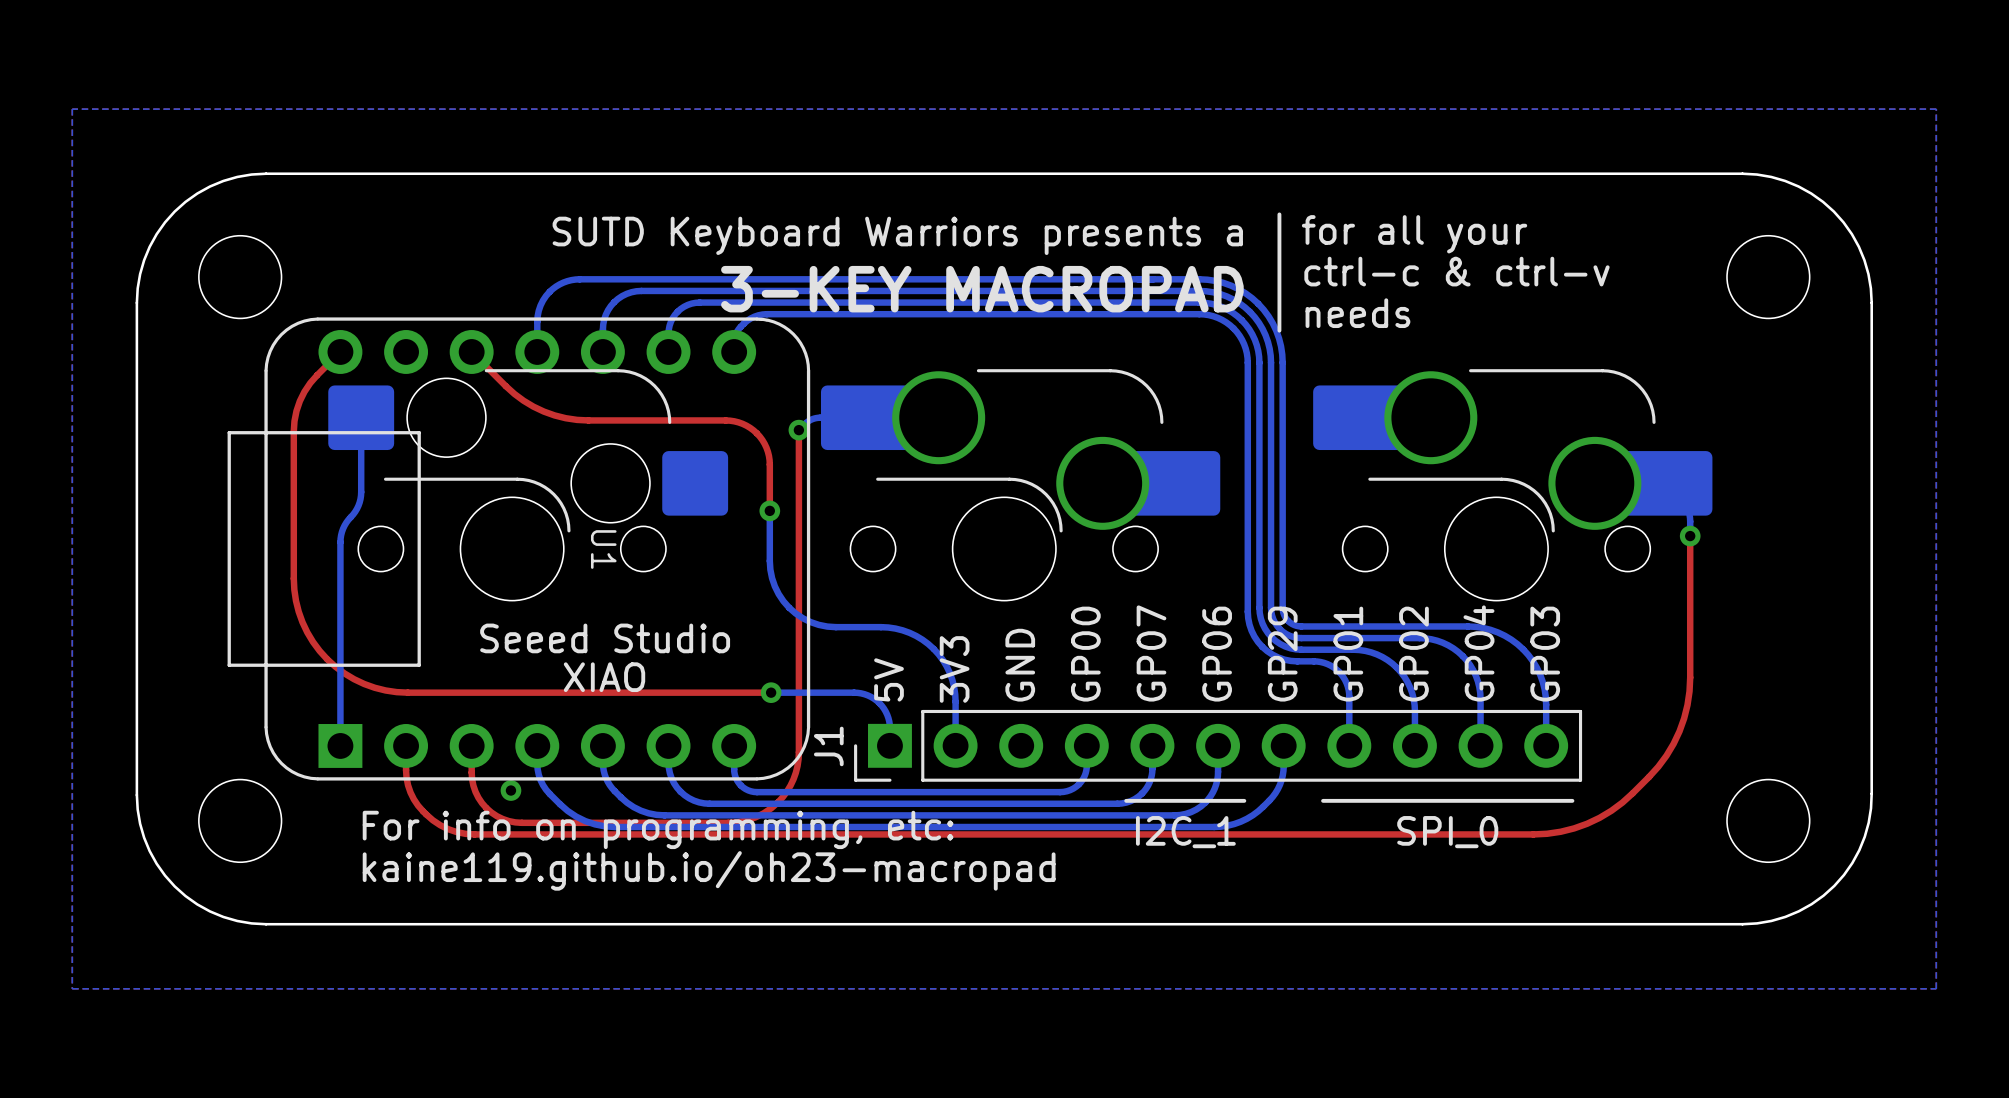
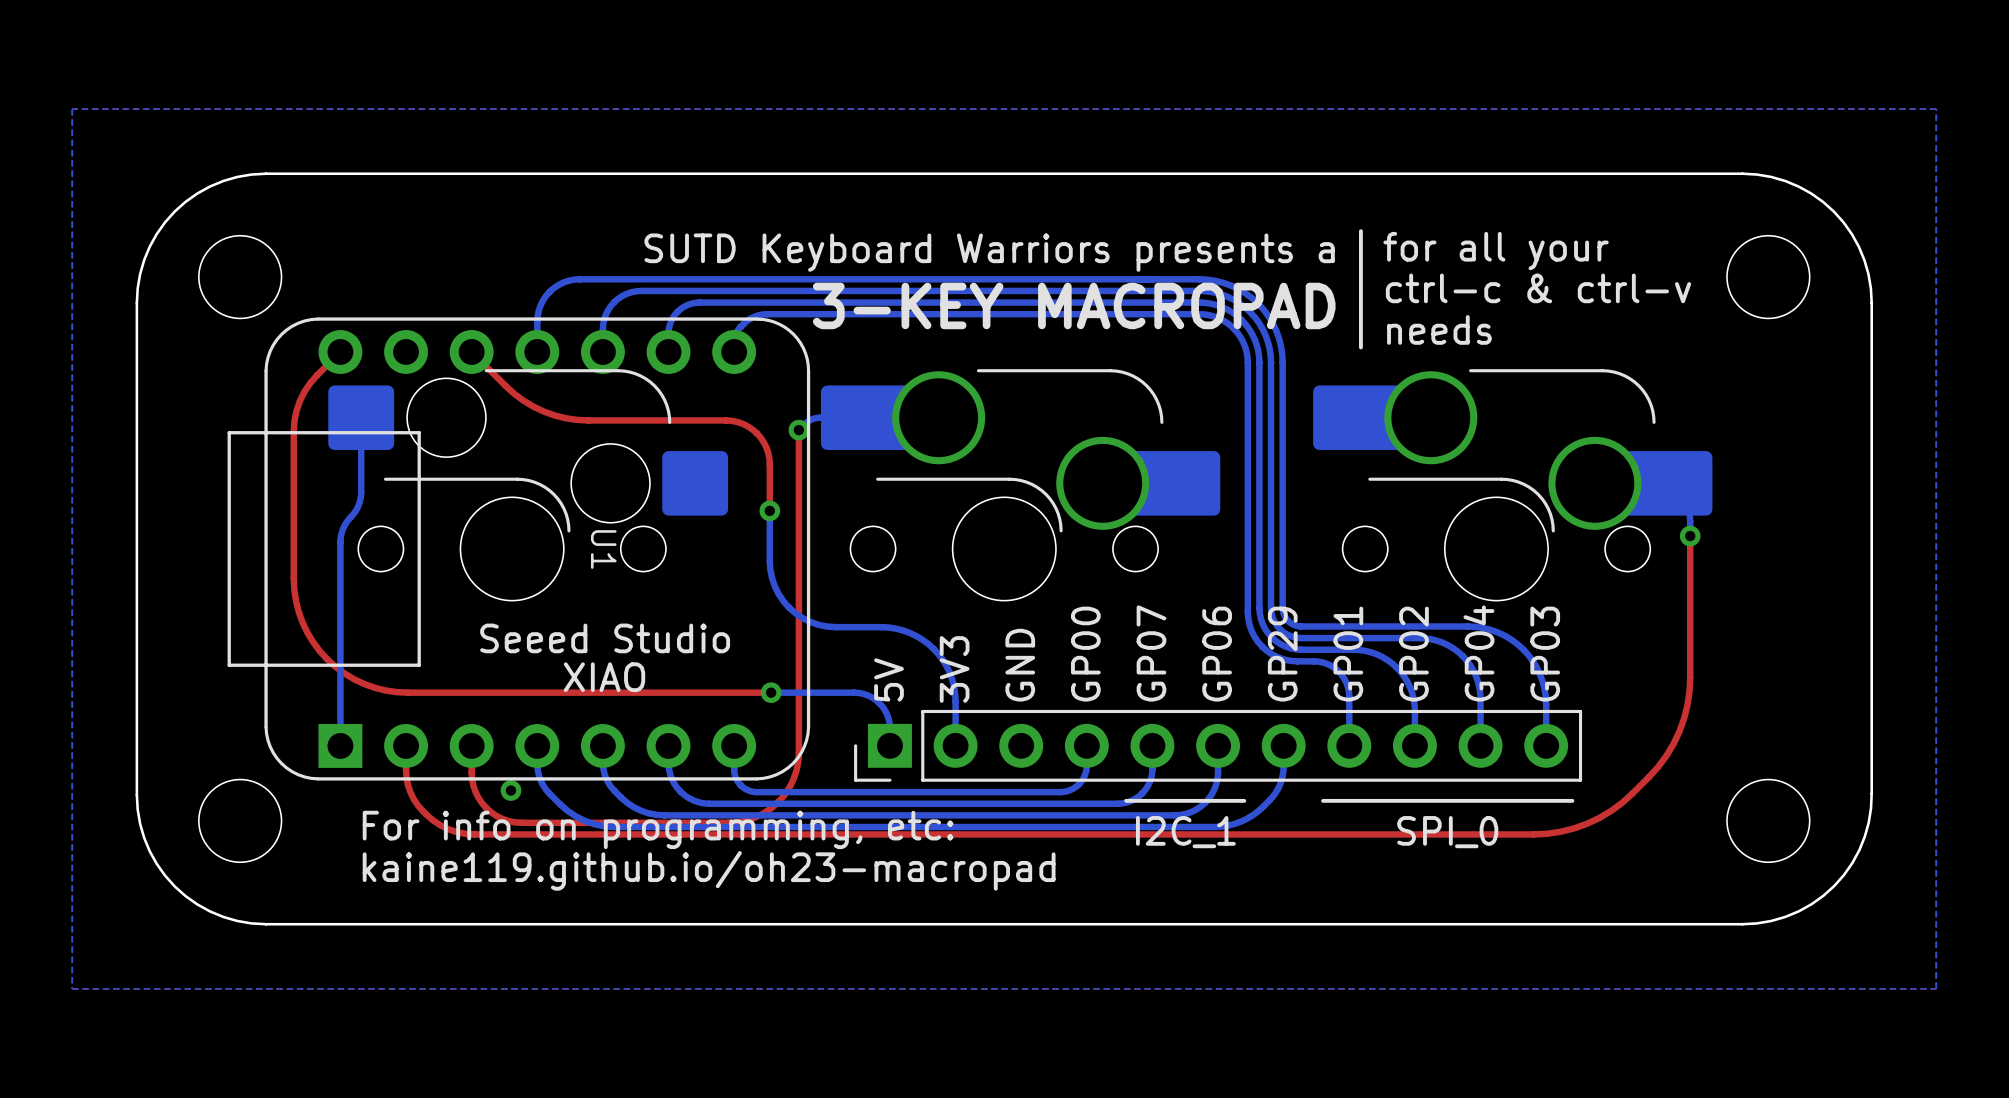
line: (1279, 214) (1279, 330) -> (1360, 231) (1360, 347)
text position: for all your (1414, 234) -> for all your (1496, 251)
text position: SUTD Keyboard Warriors presents a (897, 235) -> SUTD Keyboard Warriors presents a (989, 252)
text position: ctrl-c & ctrl-v (1456, 271) -> ctrl-c & ctrl-v (1538, 288)
text position: 3-KEY MACROPAD (982, 289) -> 3-KEY MACROPAD (1074, 305)
text position: needs (1357, 313) -> needs (1439, 329)
J1 name: J1 (828, 746) -> none

